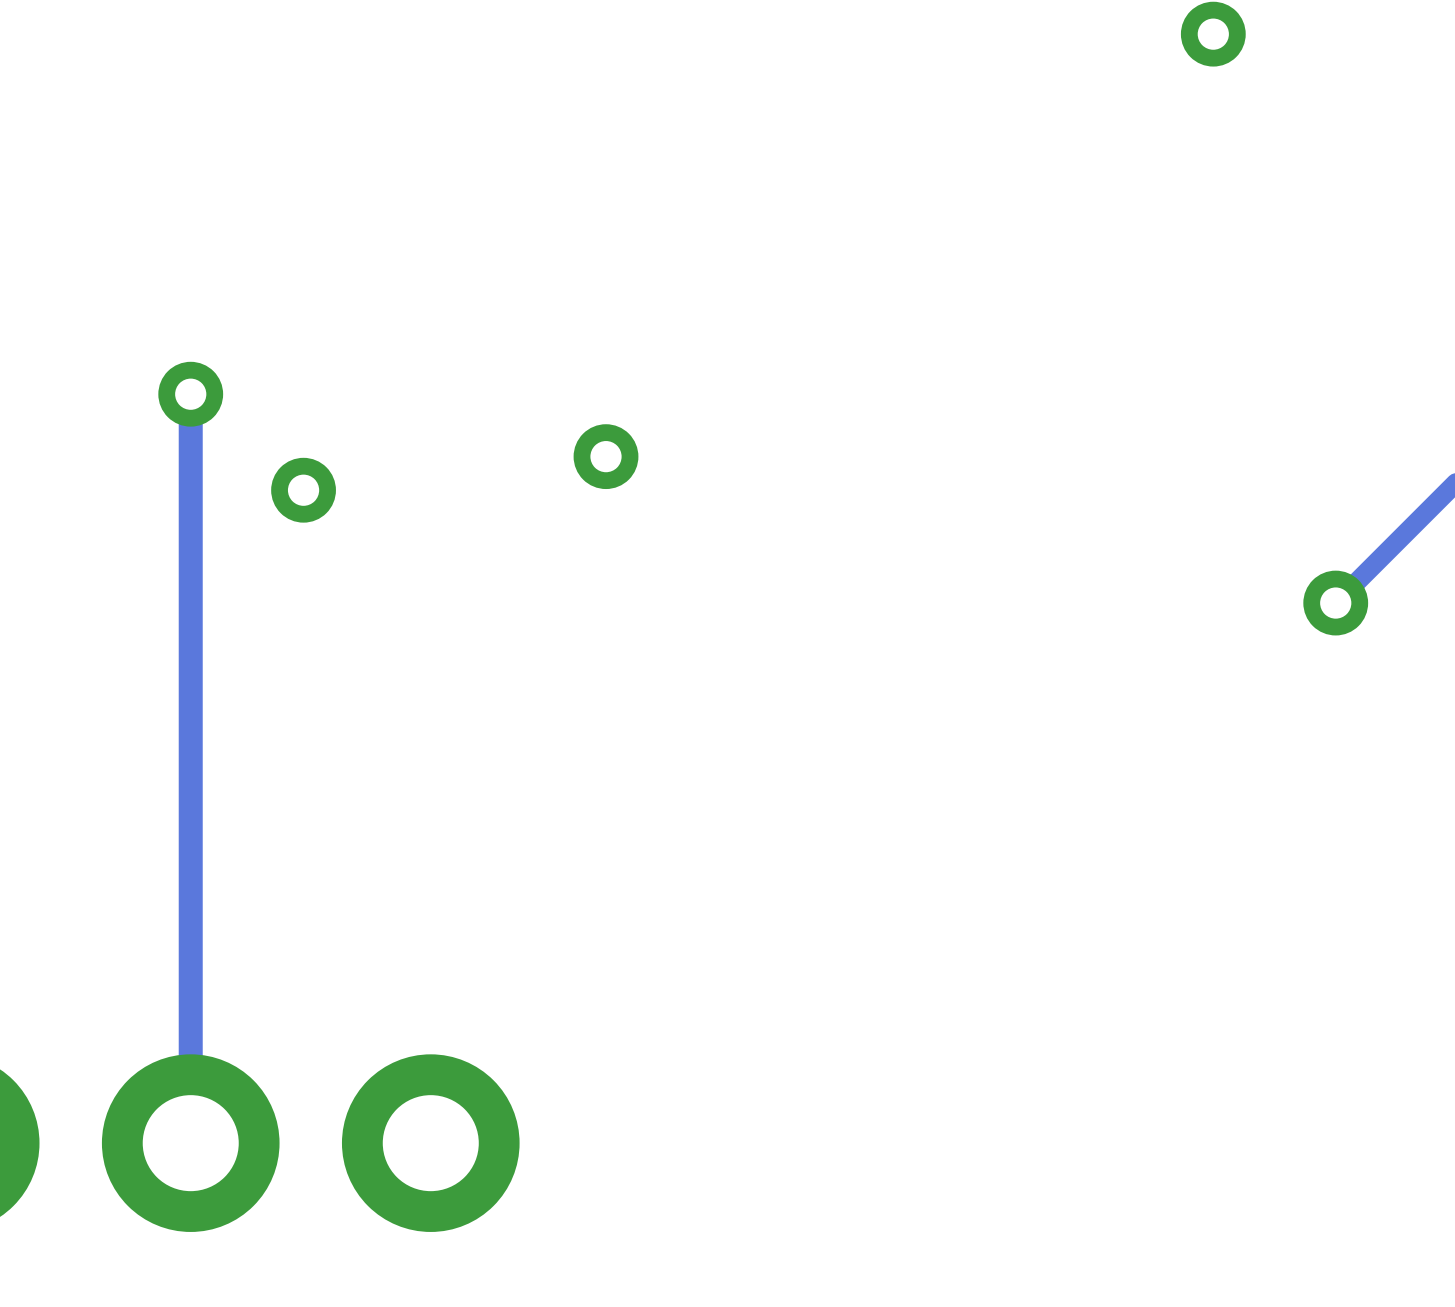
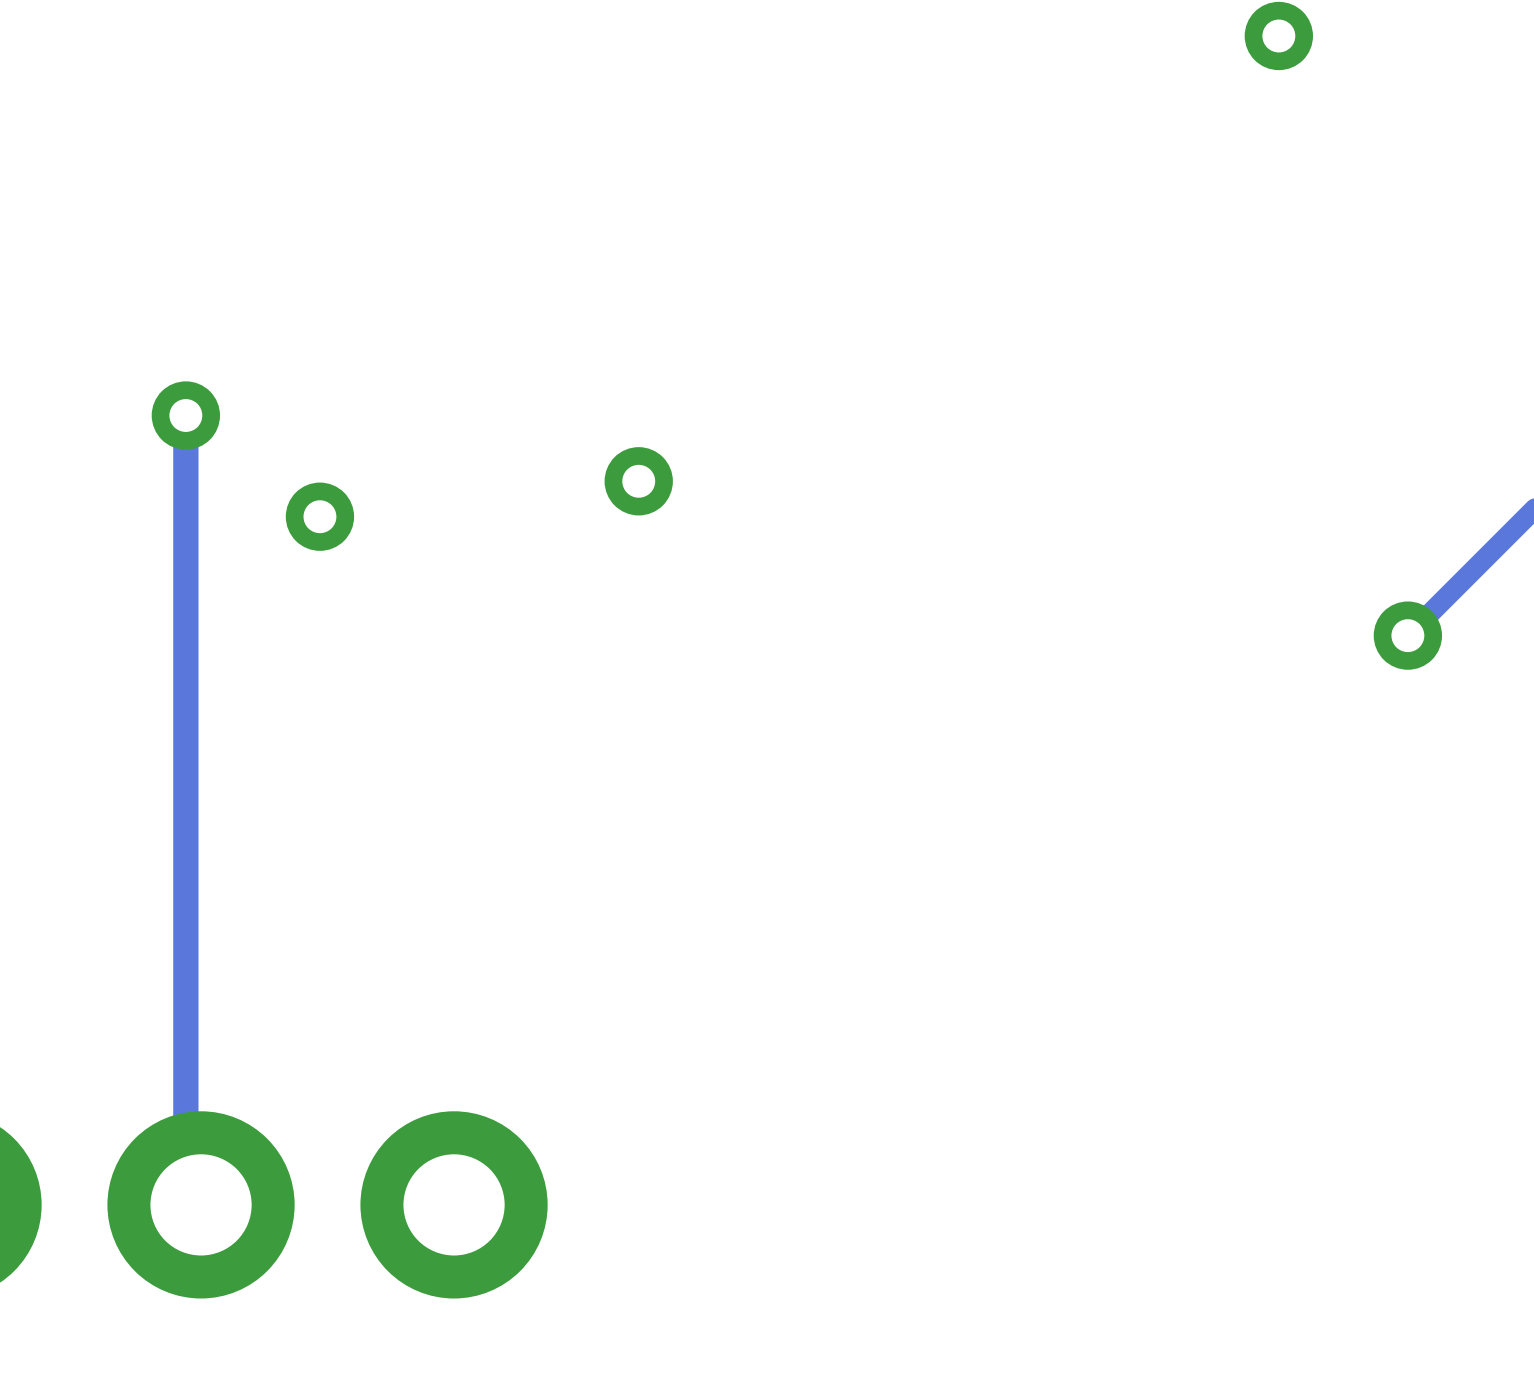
track: (190, 394) (190, 1143) -> (185, 415) (185, 1189) (201, 1204)
via position: (190, 394) -> (185, 415)

